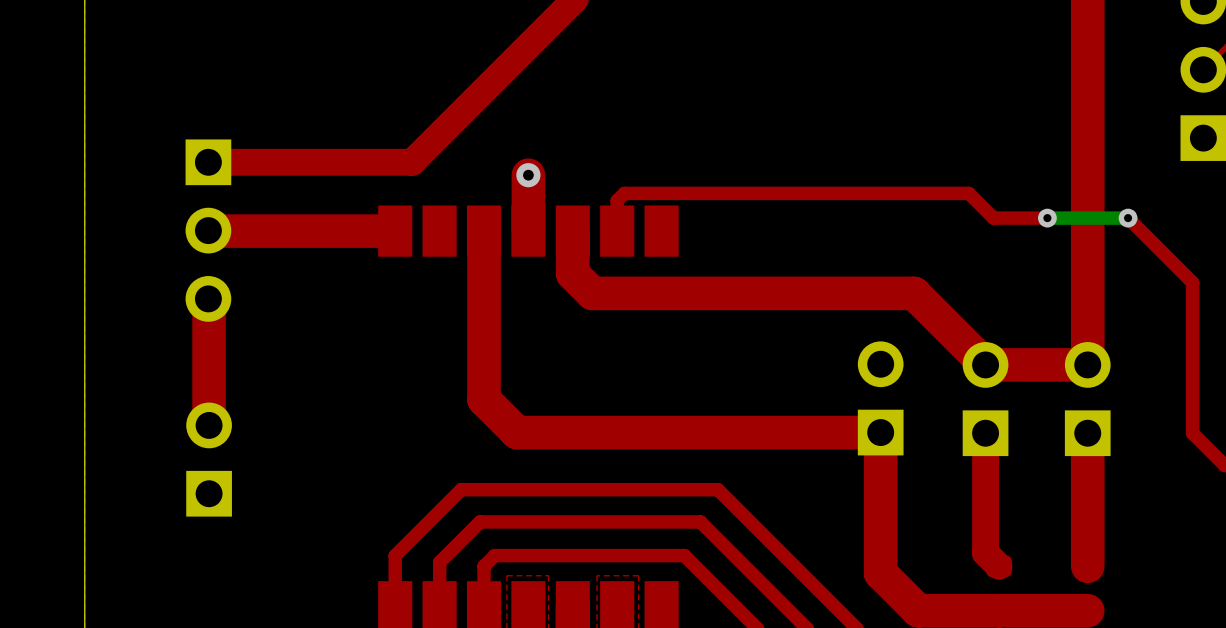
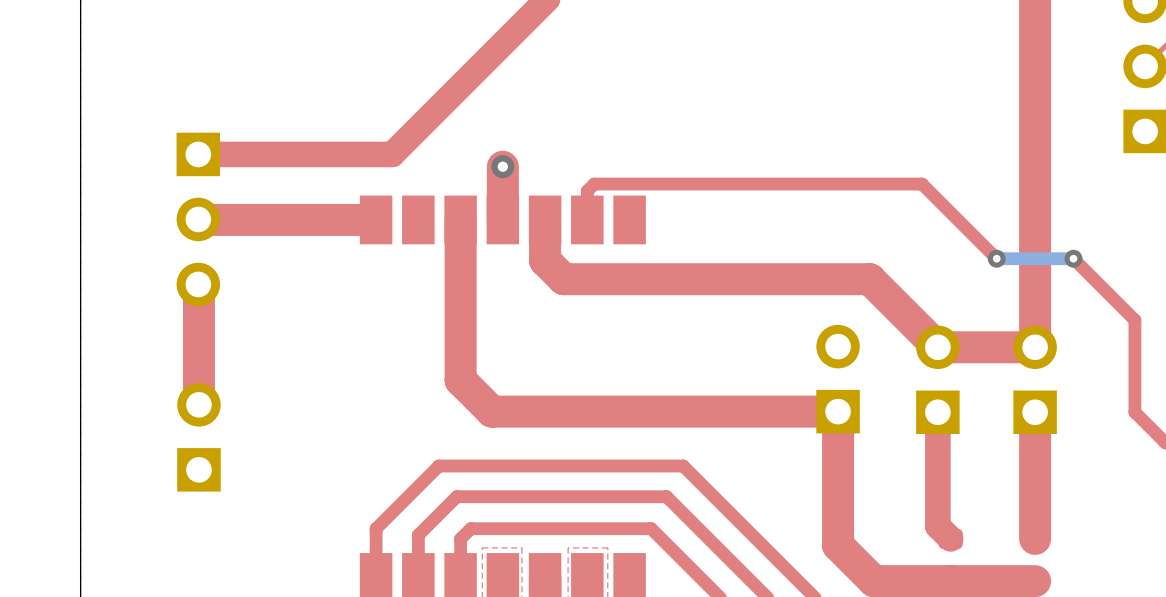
top track: (1047, 218) (993, 218) -> (996, 258) (945, 207)
via: (1047, 218) -> none
top track: (1128, 218) (1192, 282) (1192, 336) -> (1073, 258) (1134, 320)
bottom track: (1128, 218) (1047, 218) -> (1073, 258) (996, 258)
via: (1128, 218) -> none
via: none -> (996, 258)
via: none -> (1073, 258)

